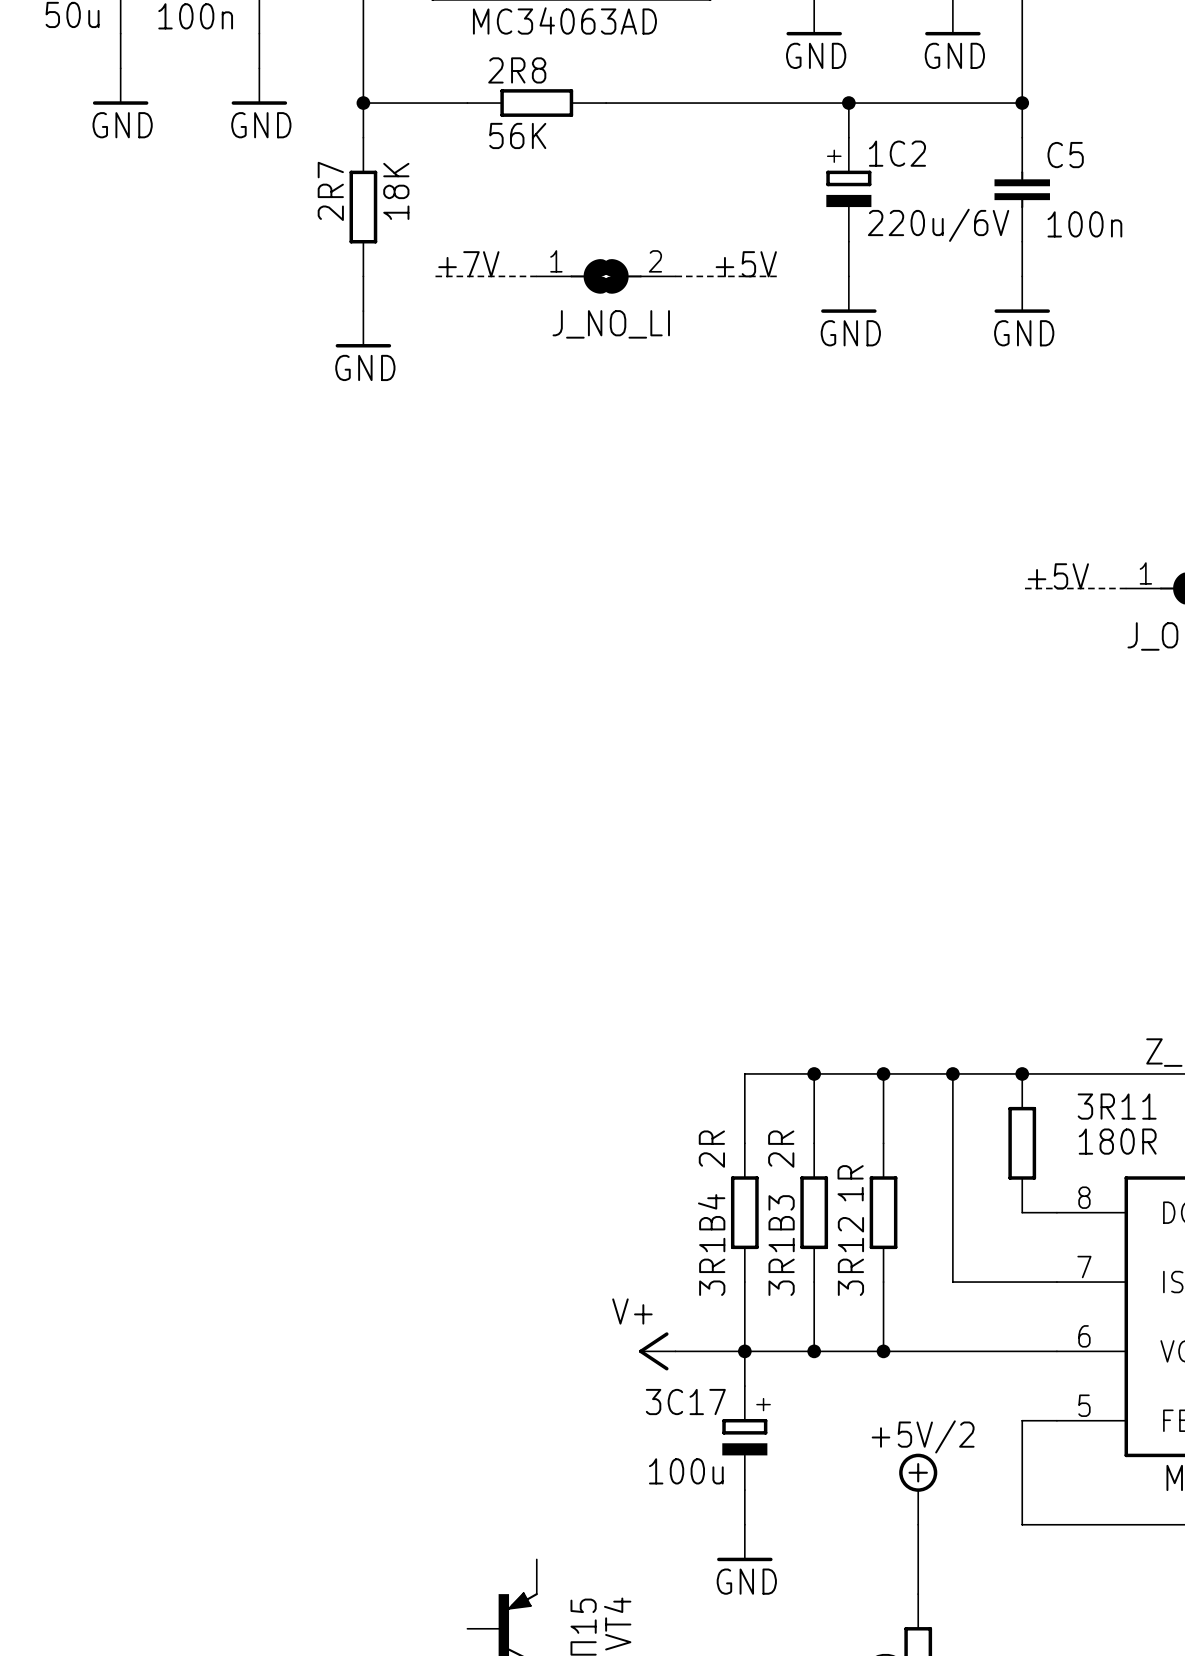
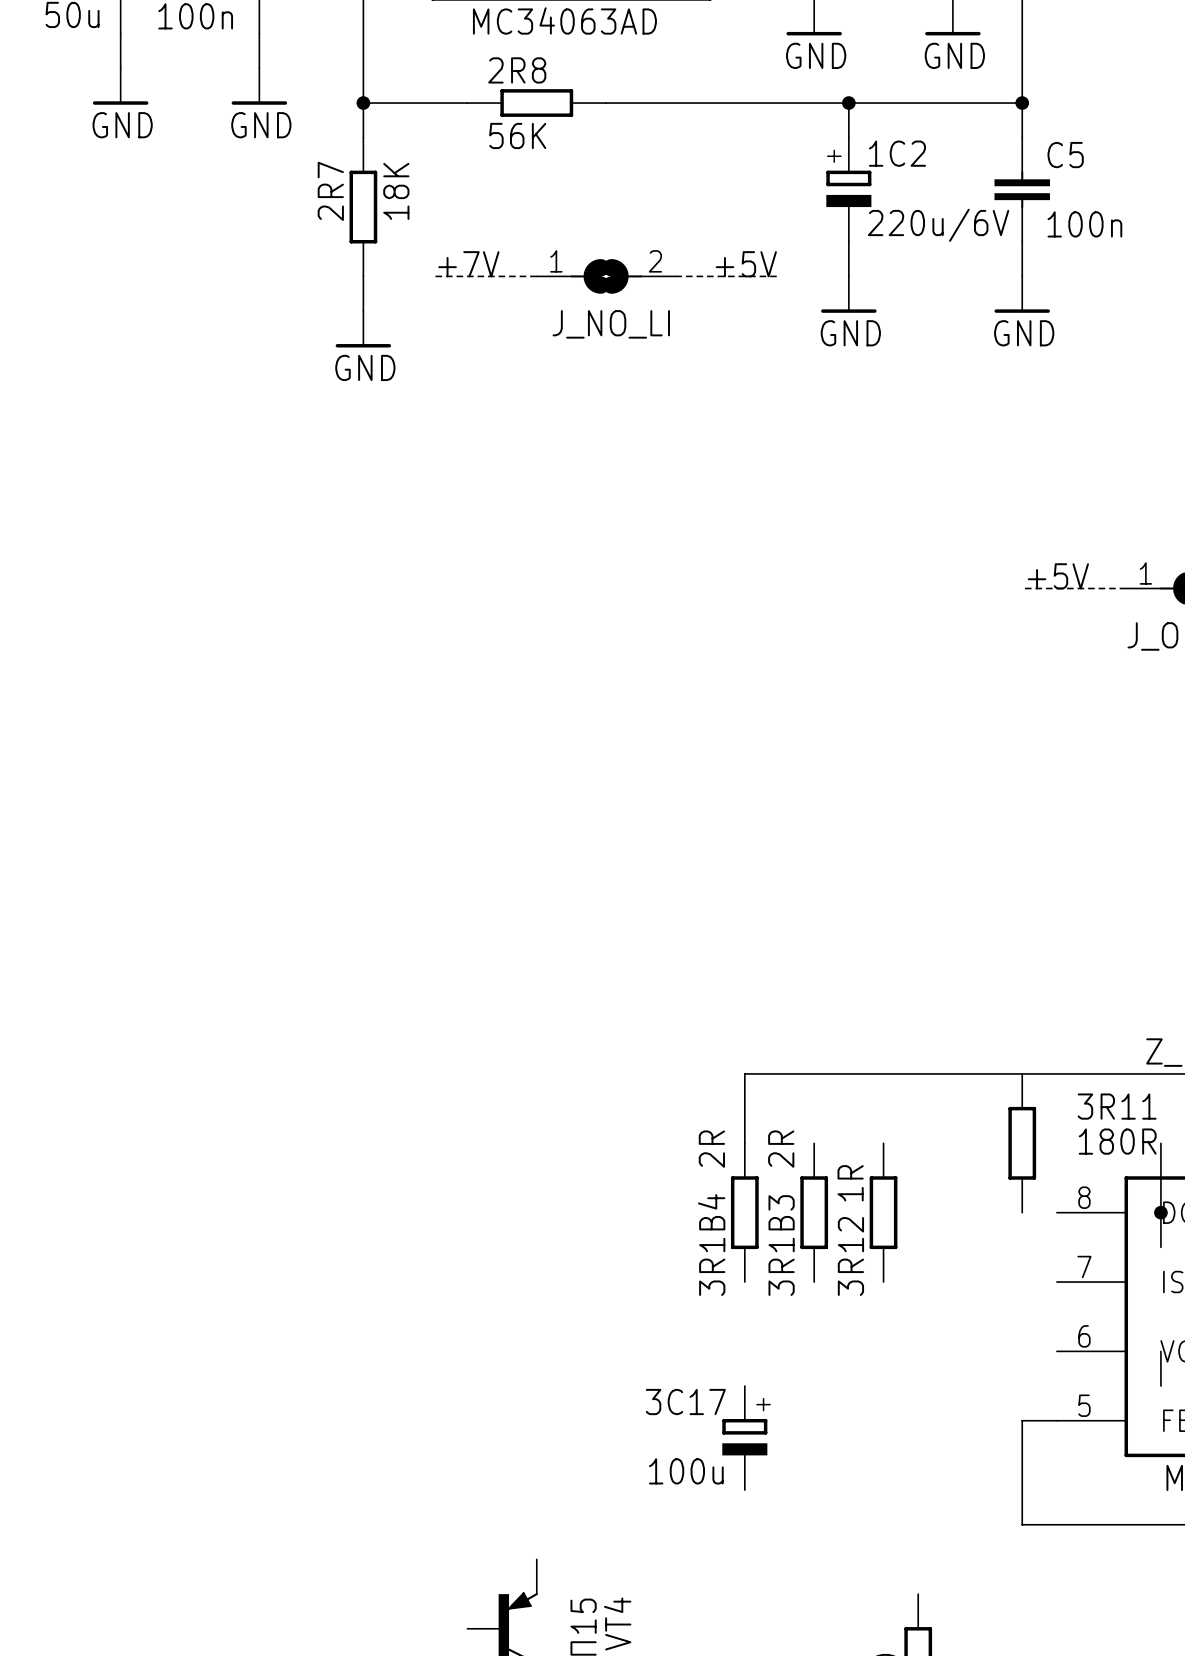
wire: (814, 1073) (814, 1143) -> none
junction: (814, 1073) -> none
wire: (883, 1073) (883, 1143) -> none
junction: (883, 1073) -> none
wire: (952, 1073) (952, 1282) (1056, 1282) -> none
junction: (952, 1073) -> none
junction: (1022, 1073) -> none
wire: none -> (1160, 1143) (1160, 1247)
wire: (1022, 1212) (1056, 1212) -> none
junction: none -> (1160, 1212)
wire: (744, 1282) (744, 1386) -> none
wire: (814, 1282) (814, 1351) -> none
wire: (883, 1282) (883, 1351) -> none
power symbol: V+ (657, 1351) -> none
wire: (675, 1351) (1056, 1351) -> none
junction: (744, 1351) -> none
junction: (814, 1351) -> none
junction: (883, 1351) -> none
wire: none -> (1160, 1351) (1160, 1386)
power symbol: +5V/2 (918, 1489) -> none
wire: (744, 1490) (744, 1524) -> none
wire: (918, 1524) (918, 1594) -> none
power symbol: GND (744, 1542) -> none

